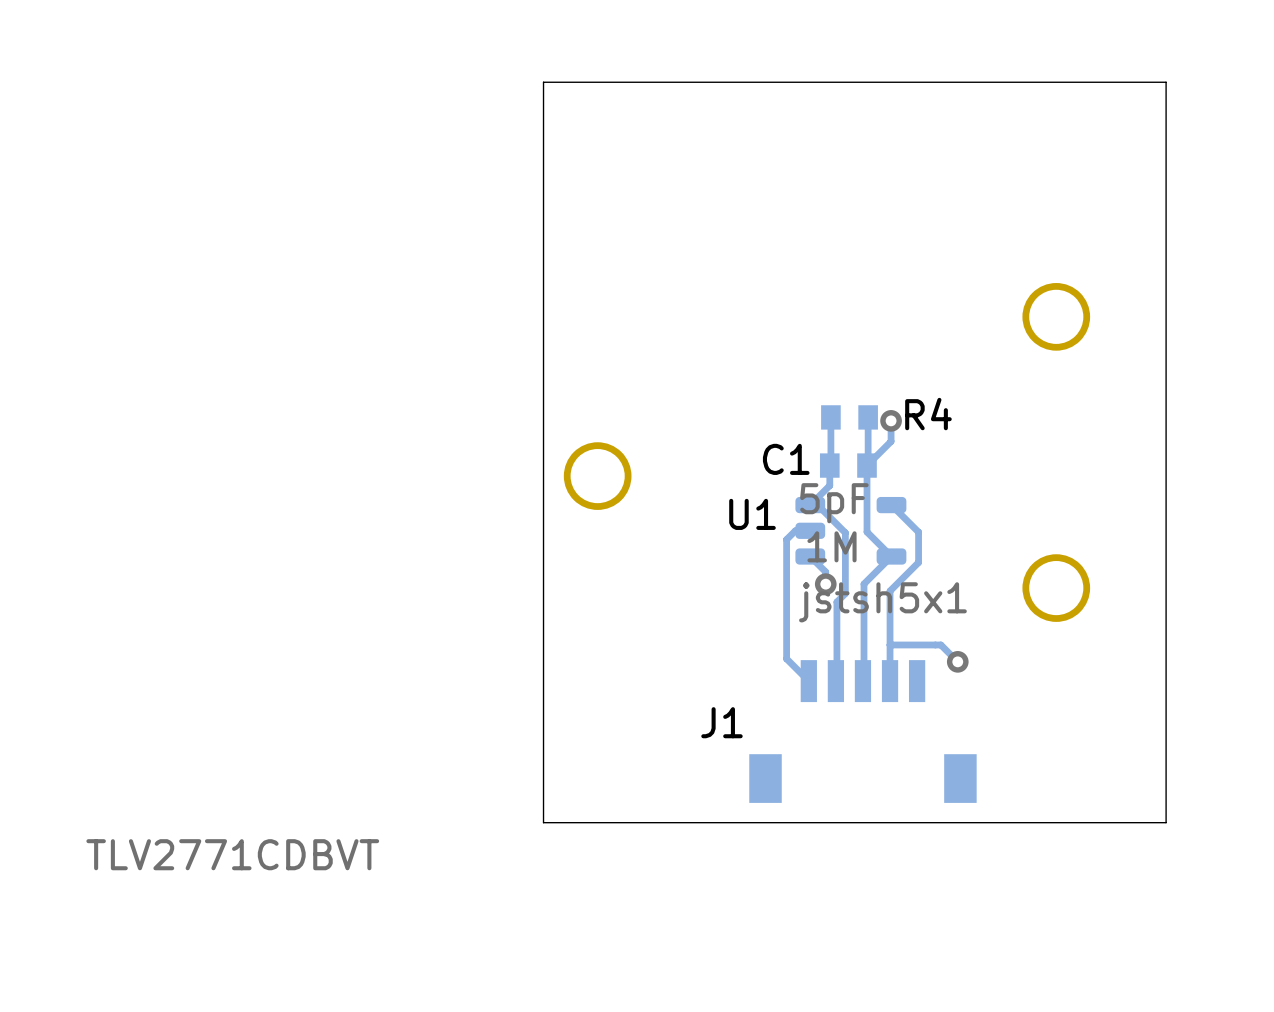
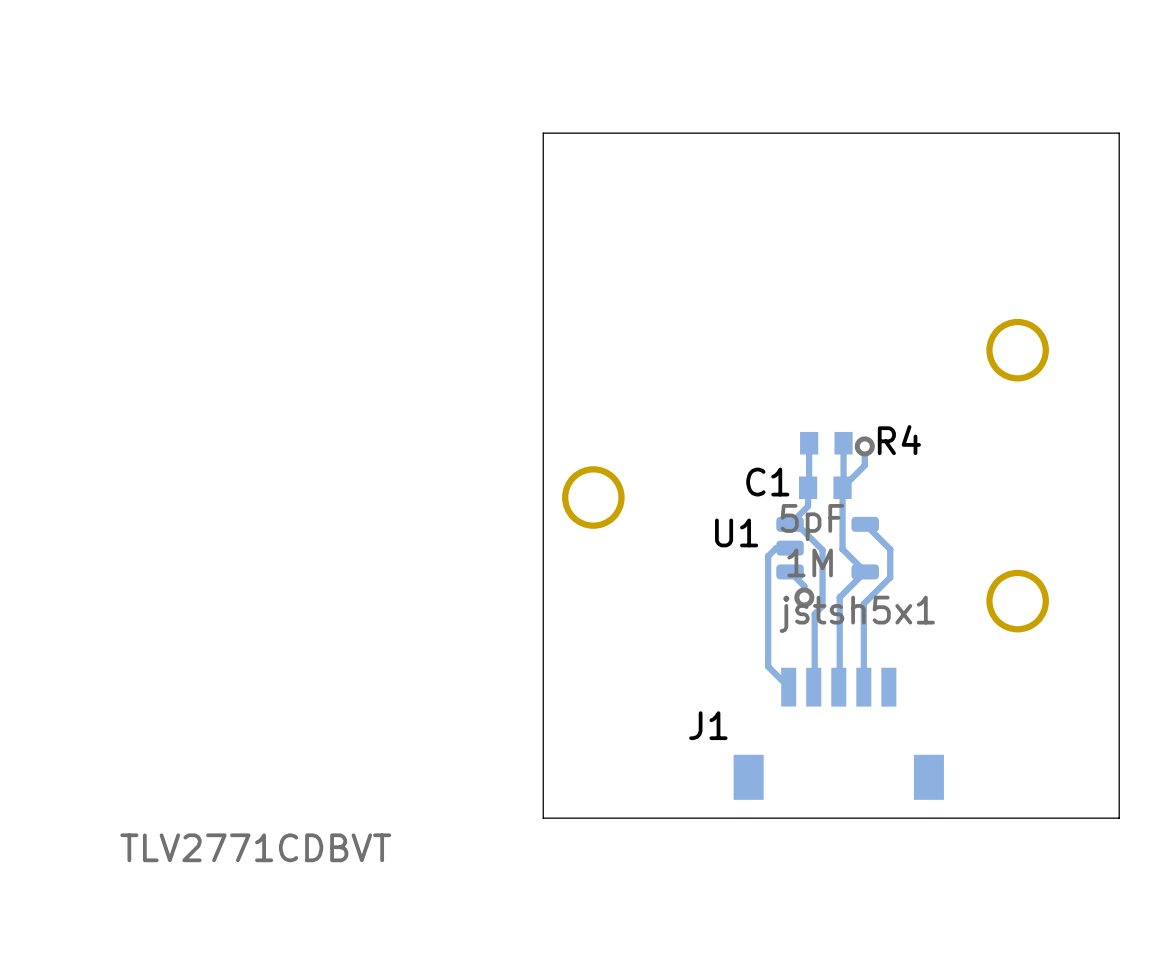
track: (890, 644) (940, 644) (957, 661) -> none
via: (957, 661) -> none

